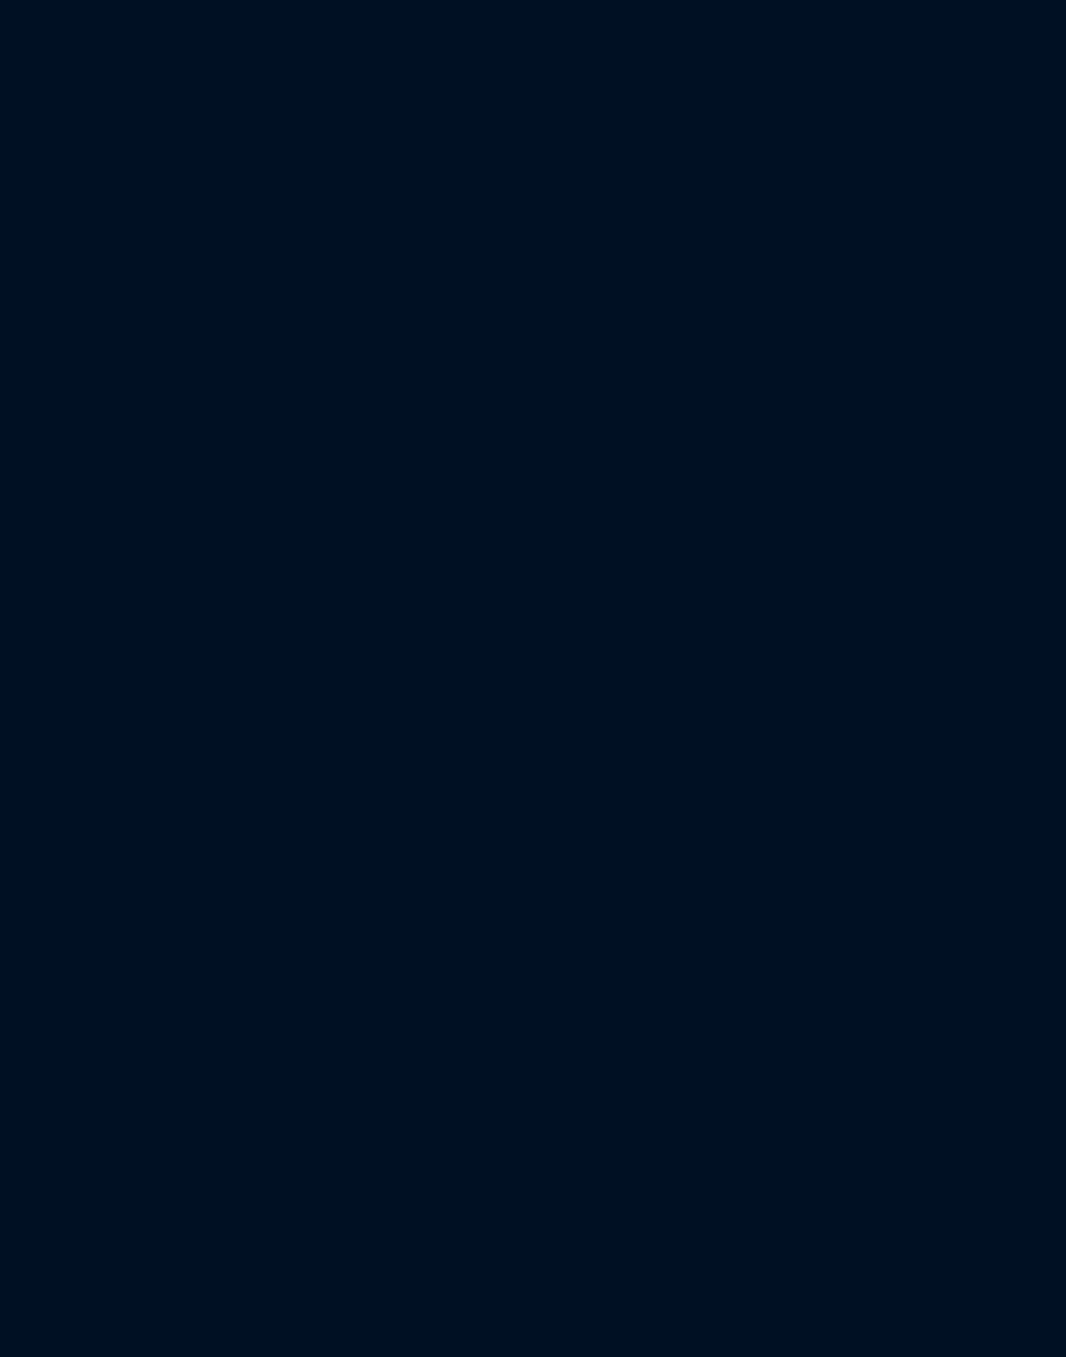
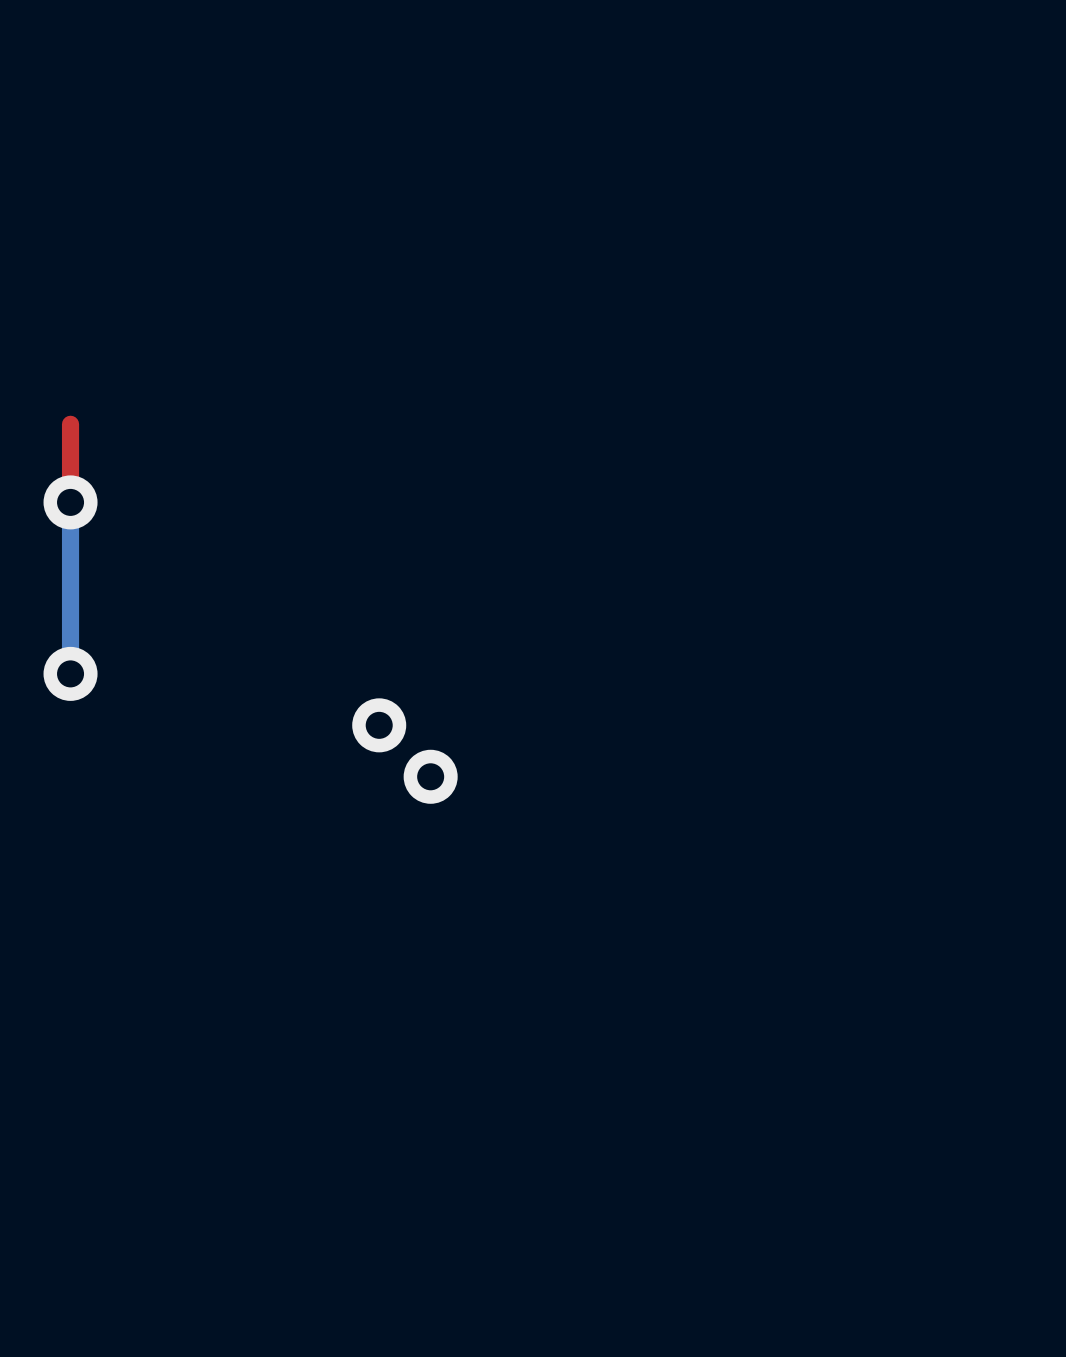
top track: none -> (70, 424) (70, 502)
bottom track: none -> (70, 502) (70, 673)
via: none -> (70, 502)
via: none -> (70, 673)
via: none -> (379, 725)
via: none -> (430, 776)

